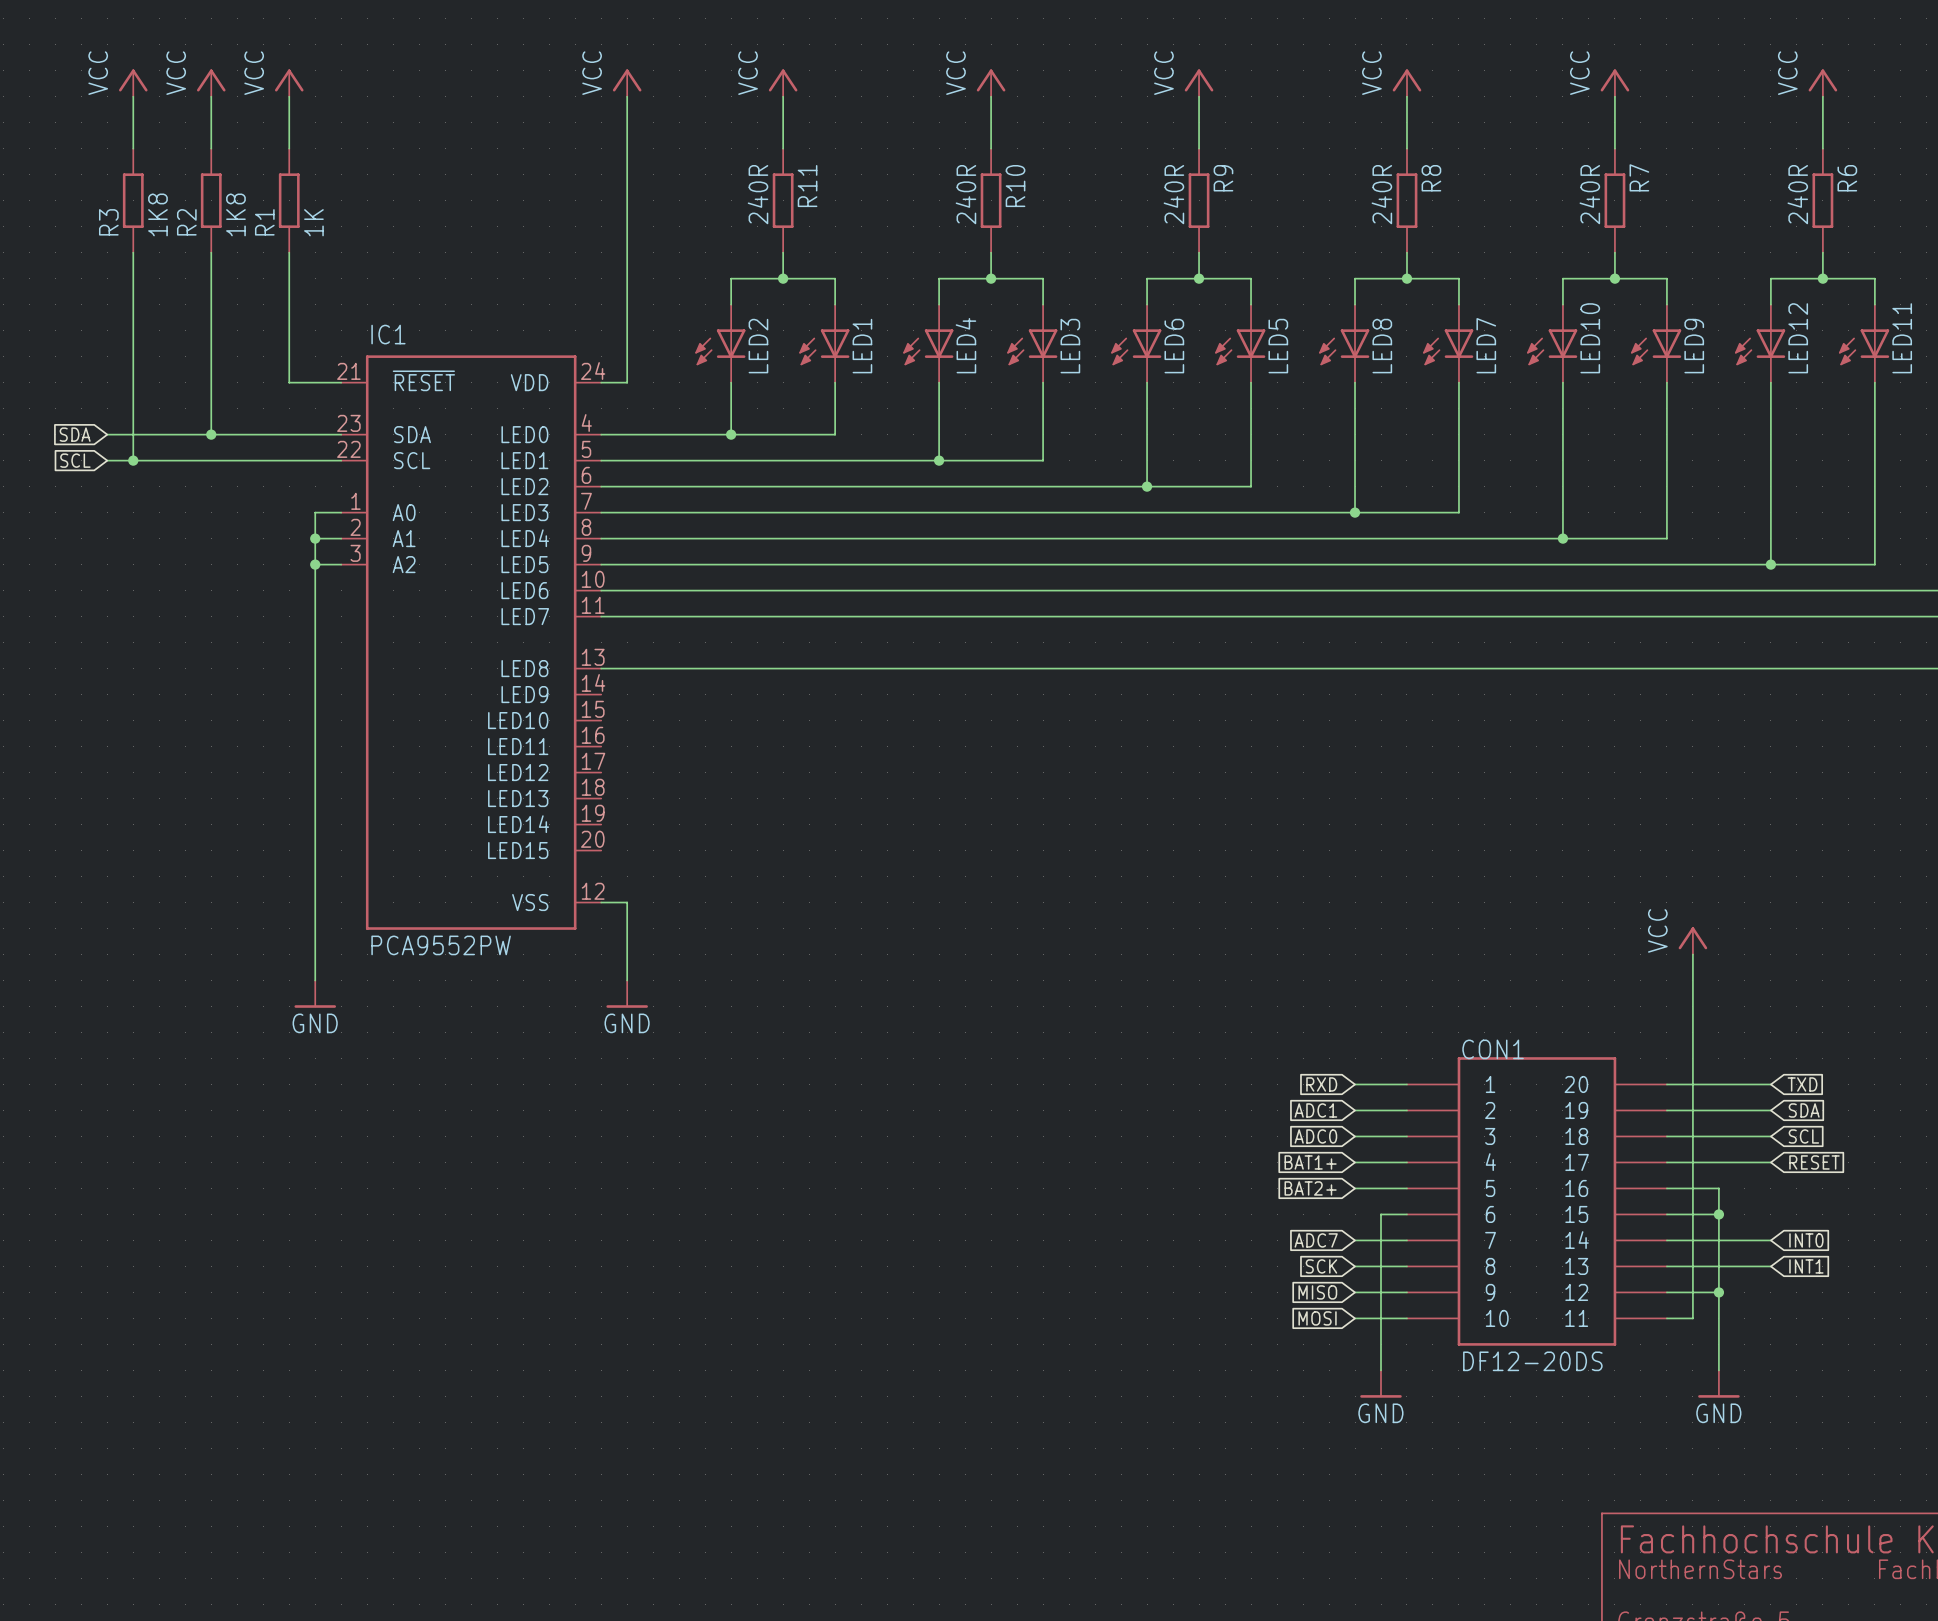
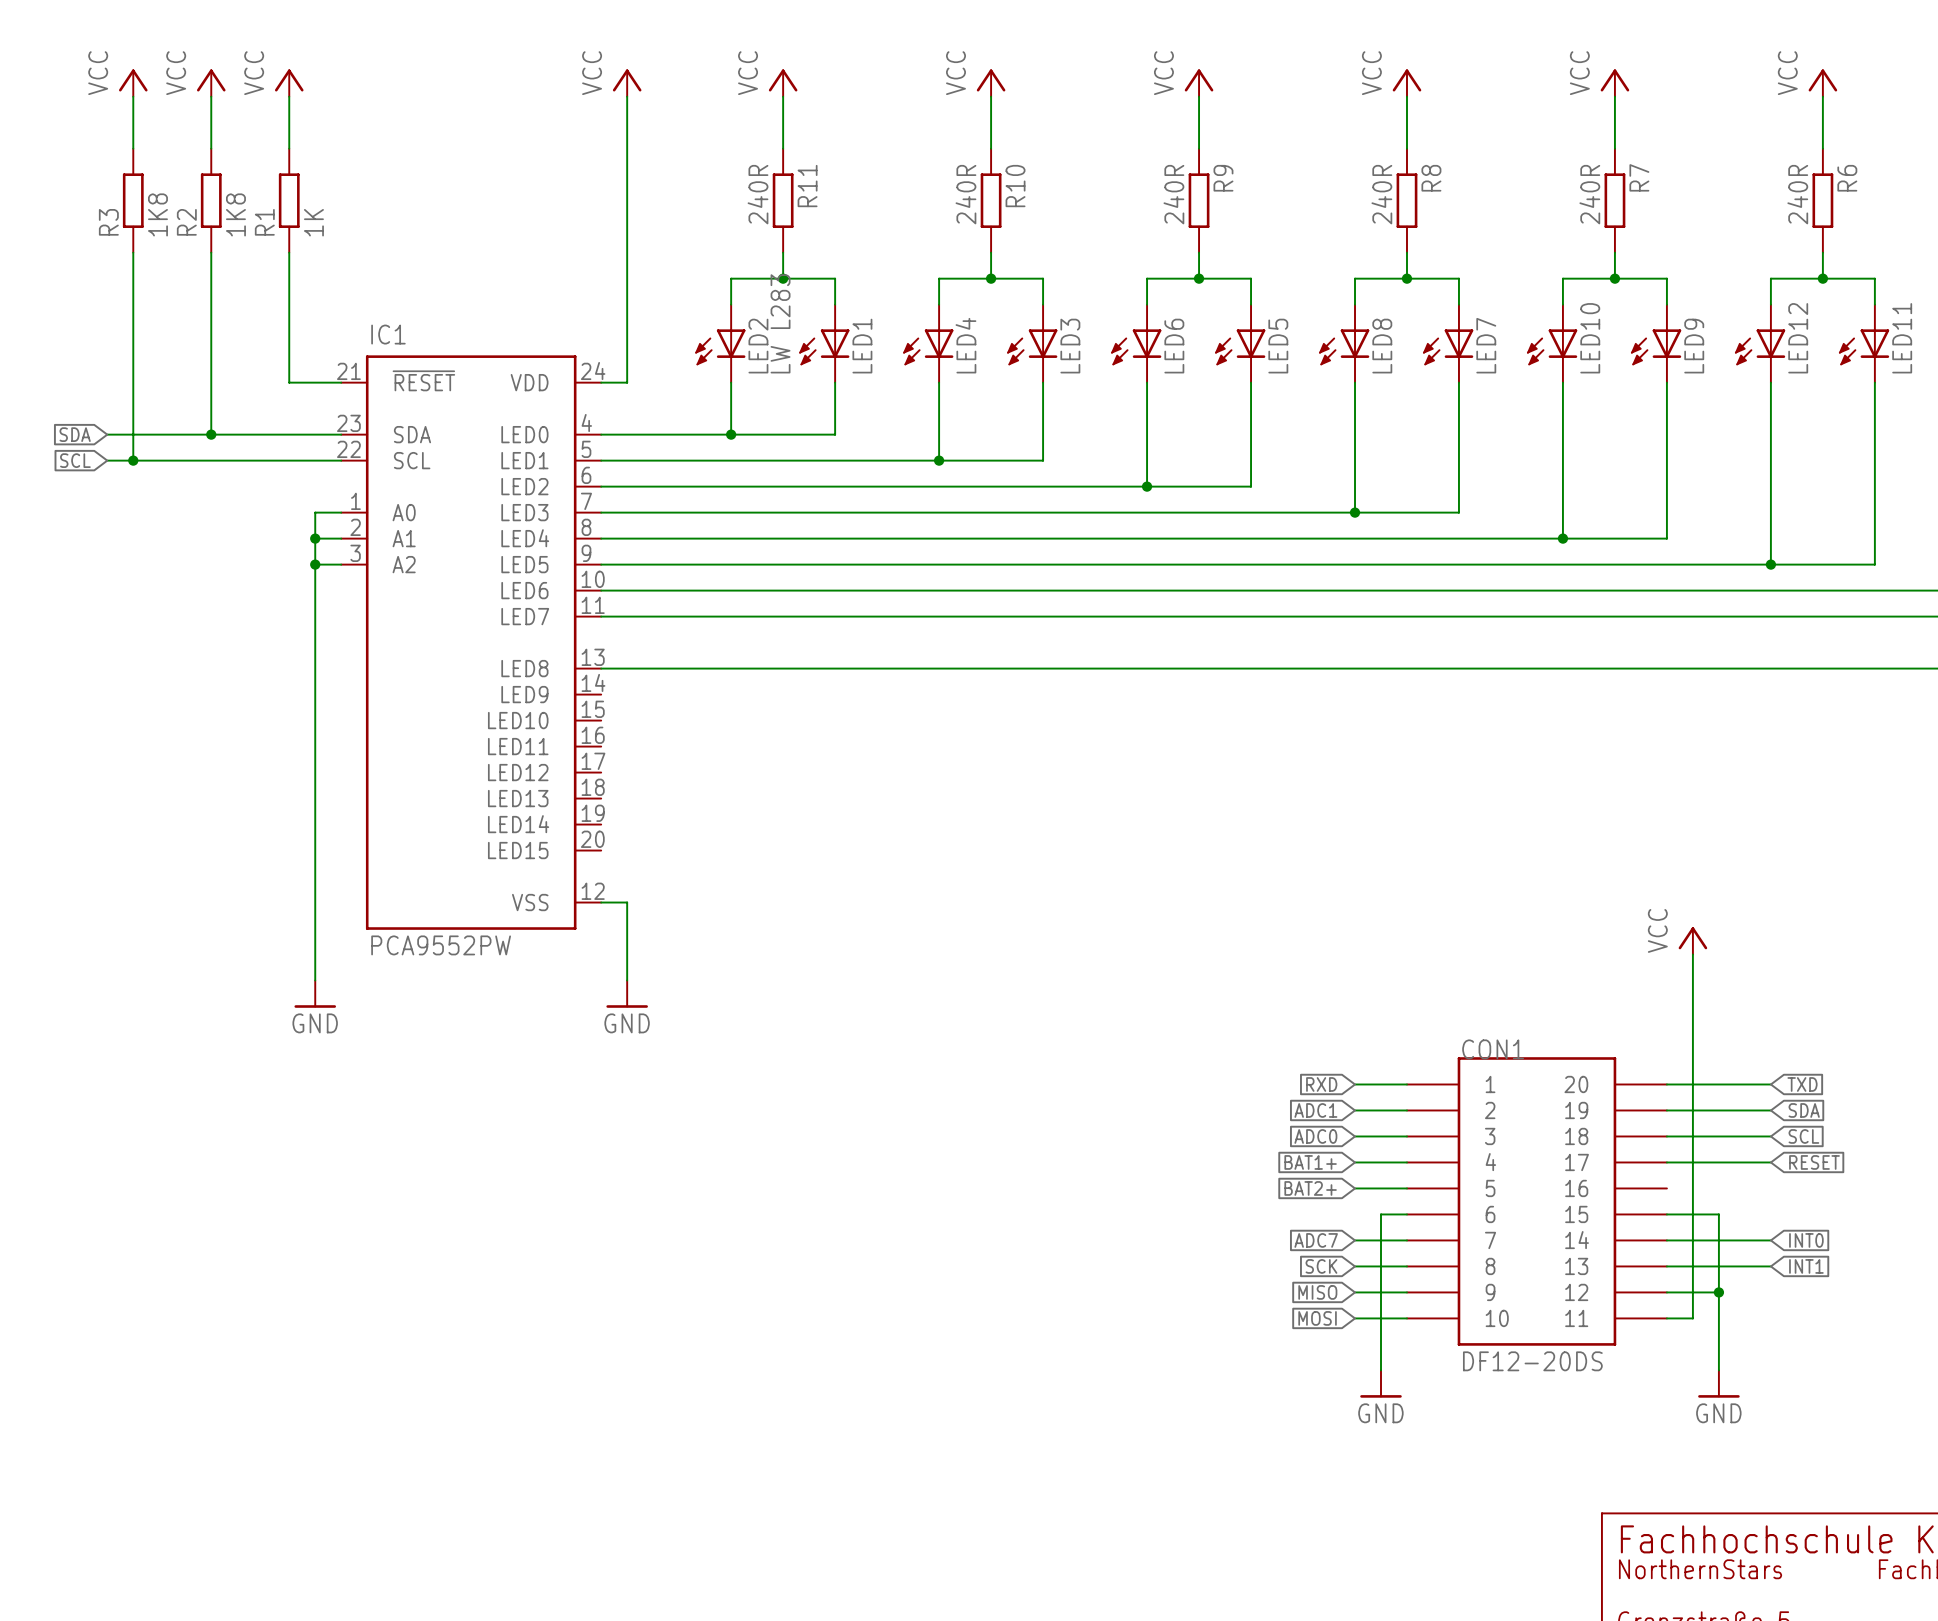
LED2 value: none -> LW L283 (780, 323)
wire: (1666, 1188) (1718, 1188) (1718, 1214) -> none
junction: (1718, 1214) -> none

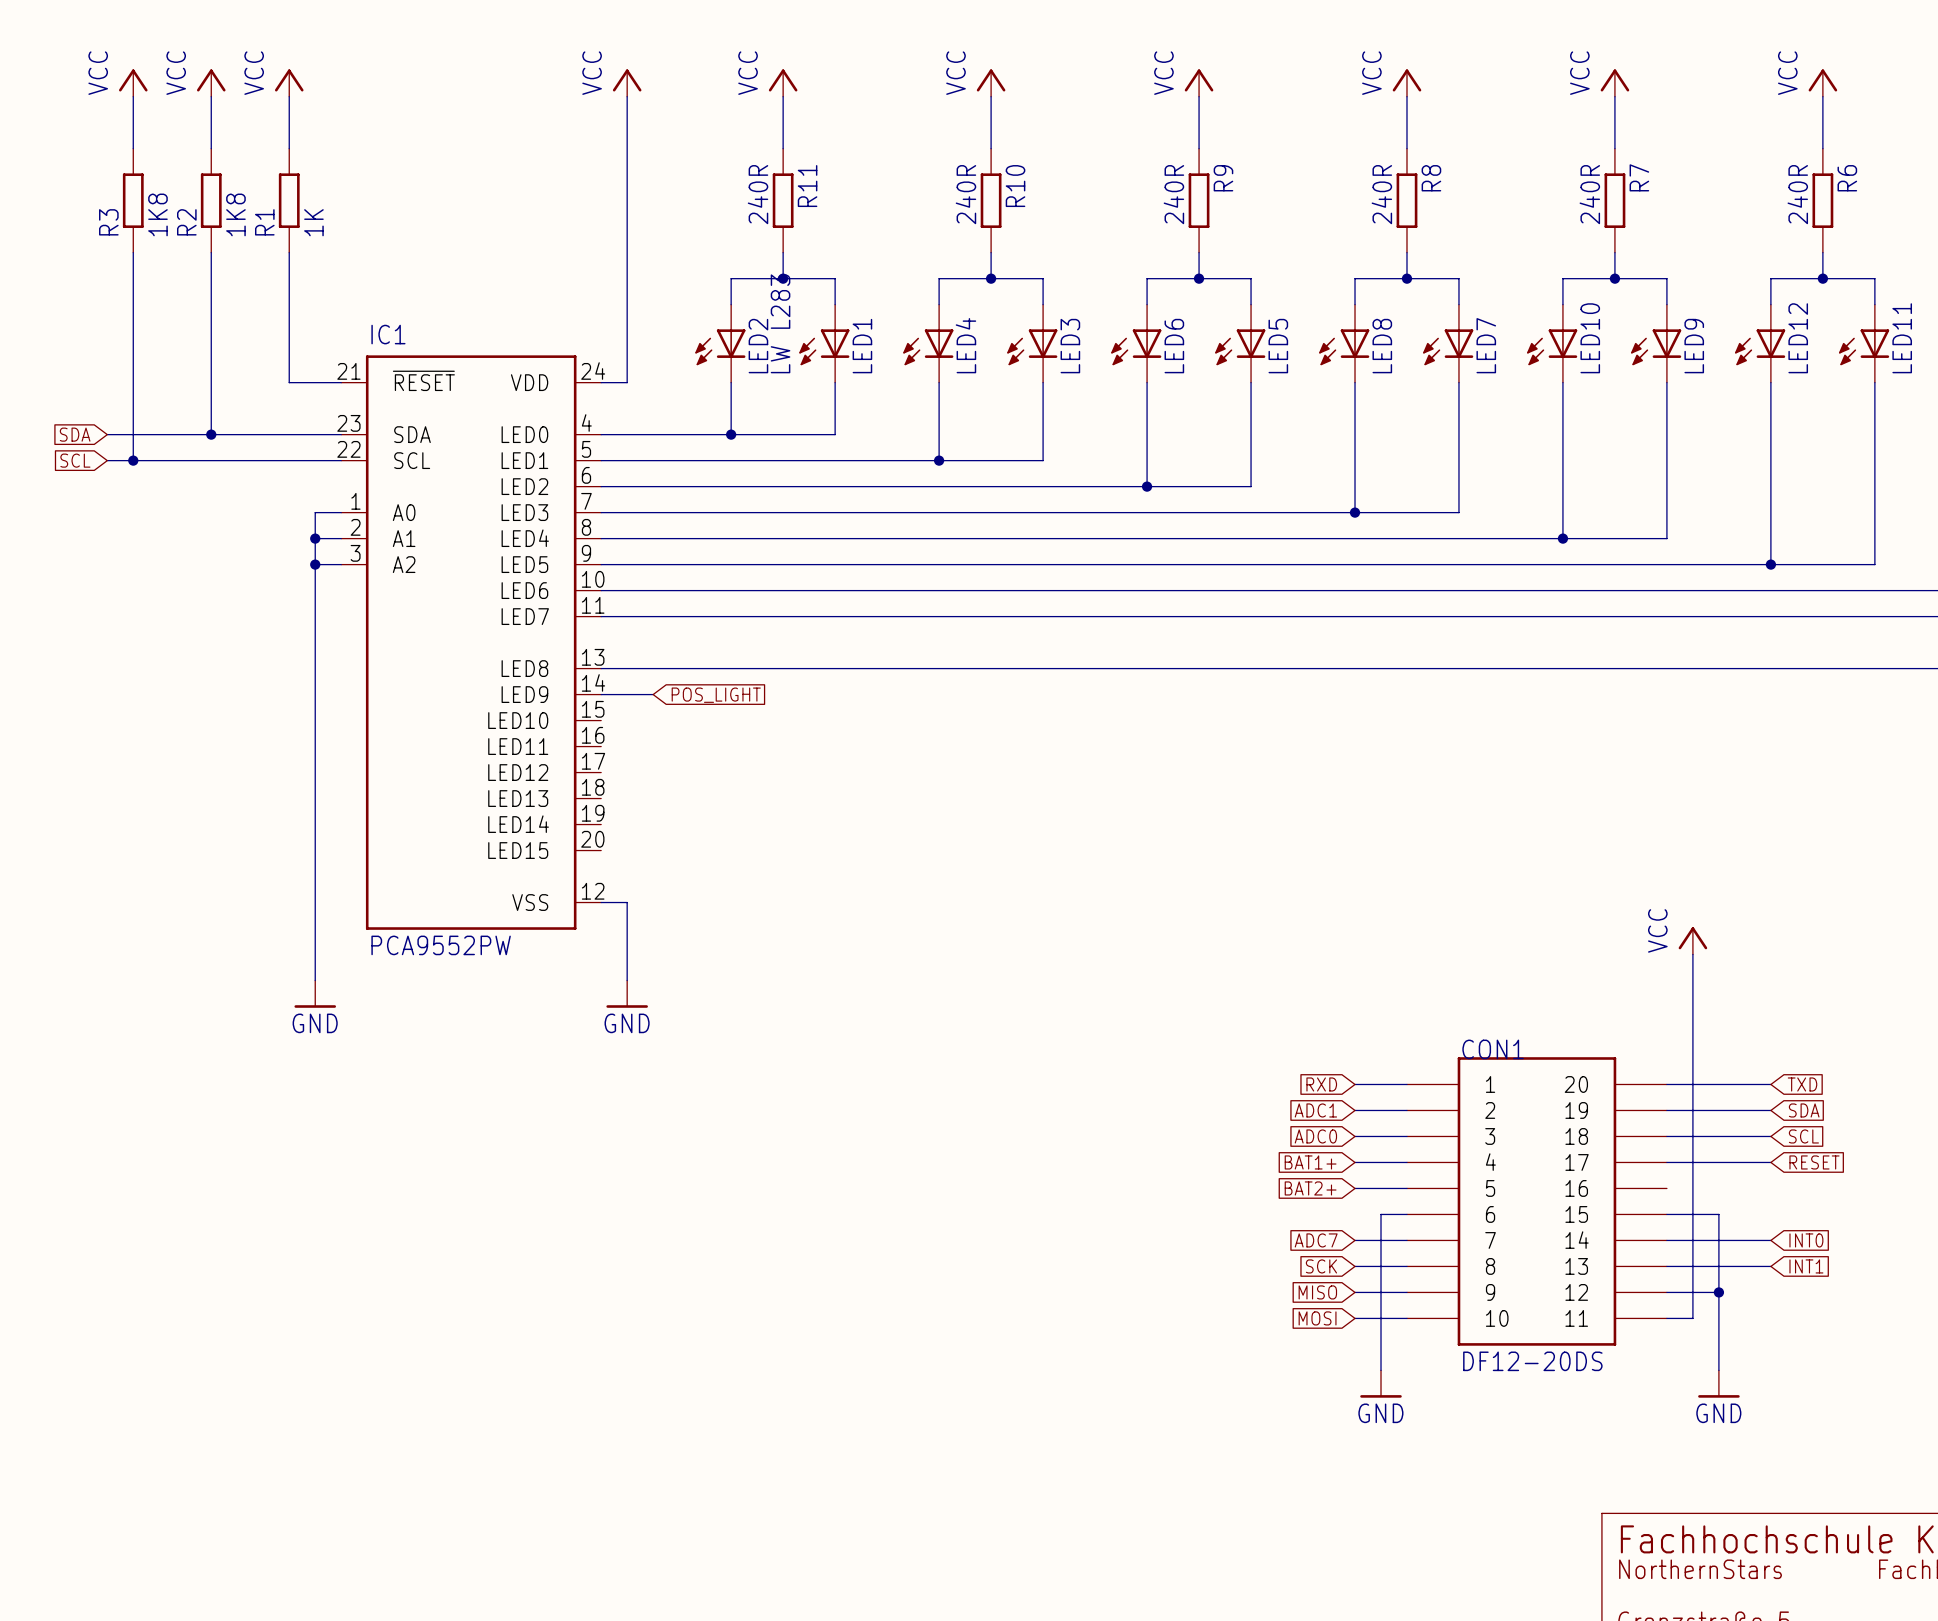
wire: none -> (601, 694) (653, 694)
global label: none -> POS_LIGHT (716, 695)

